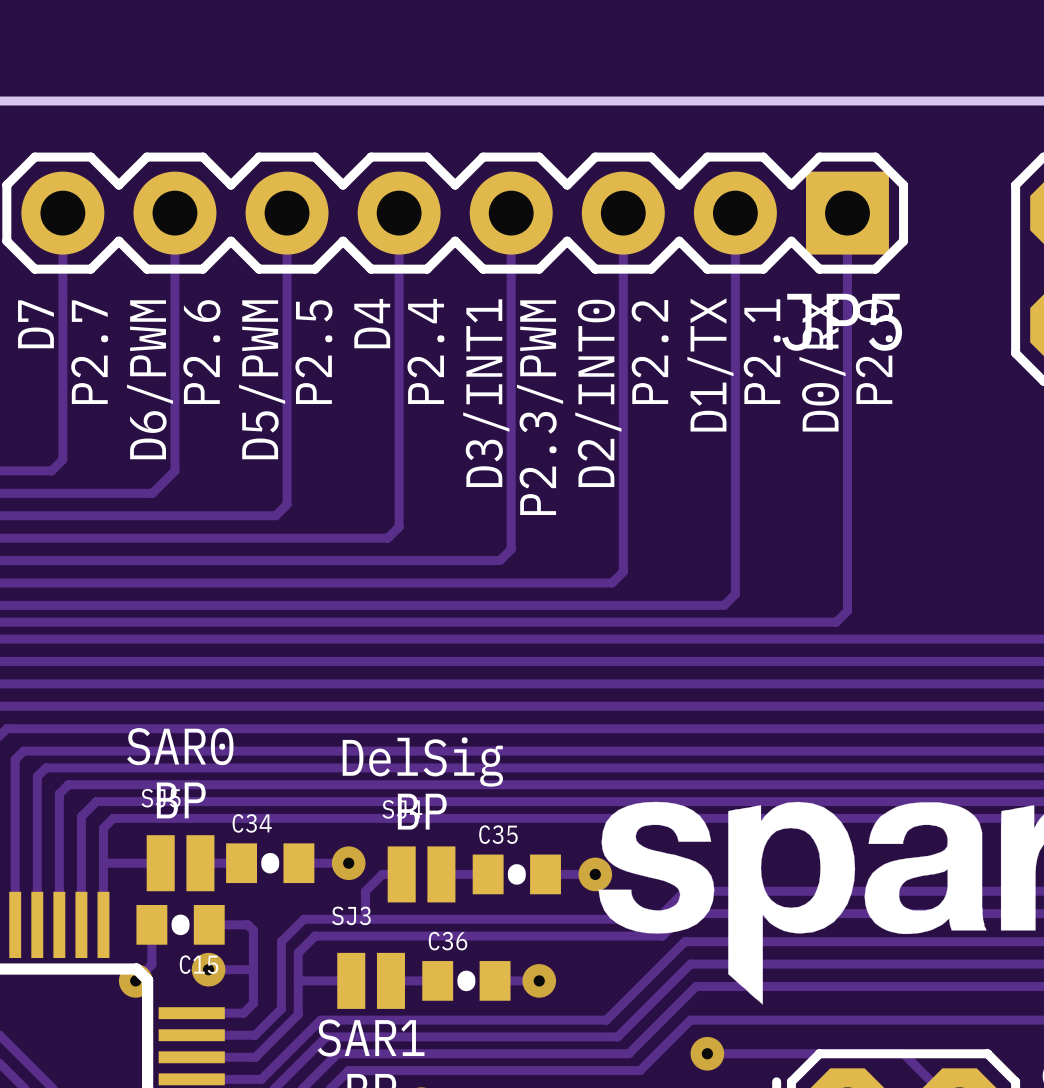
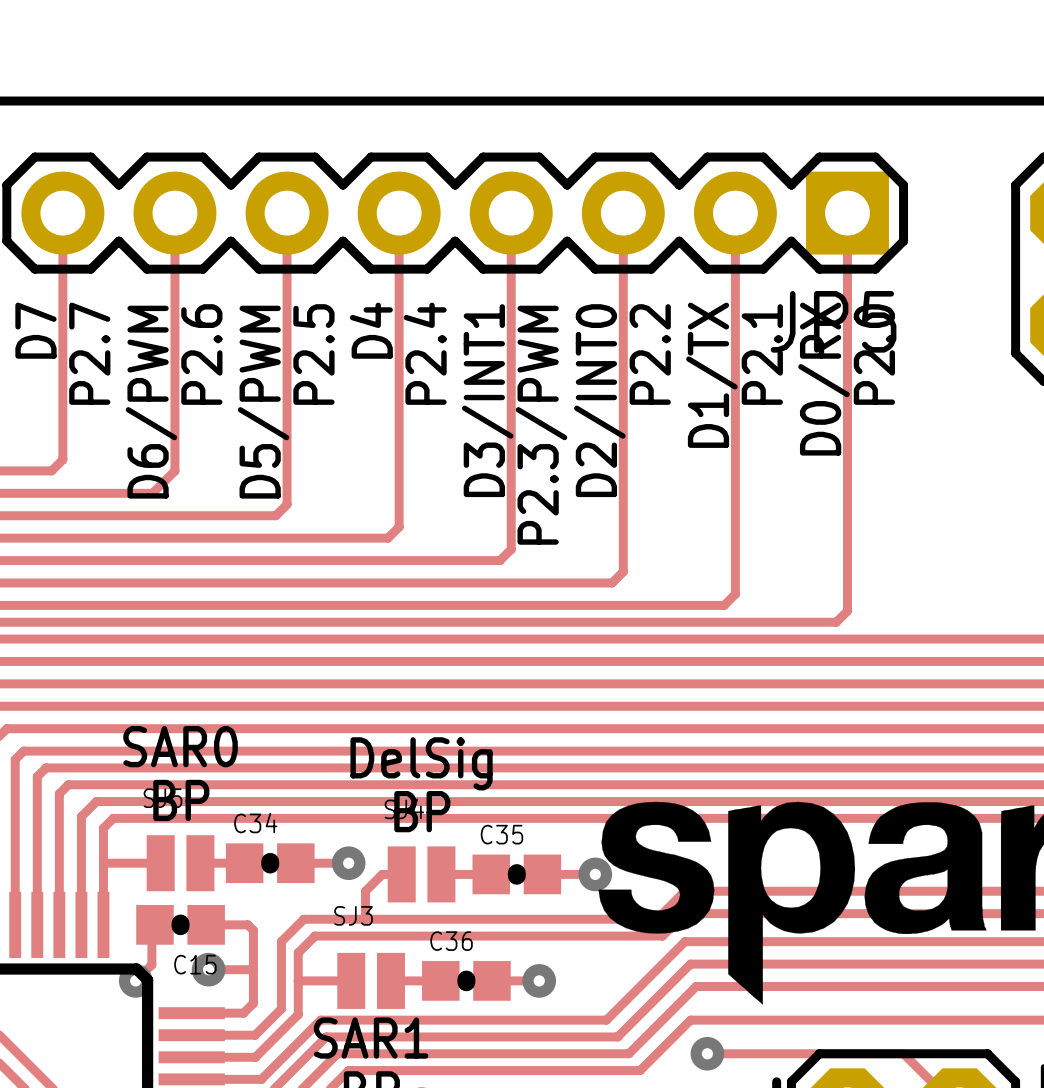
C34 footprint: [226, 843, 315, 884] -> [225, 843, 315, 884]
C35 footprint: [472, 854, 561, 895] -> [472, 854, 562, 895]
C15 footprint: [136, 905, 225, 945] -> [136, 905, 225, 945]
C36 footprint: [422, 961, 511, 1001] -> [422, 961, 511, 1001]

